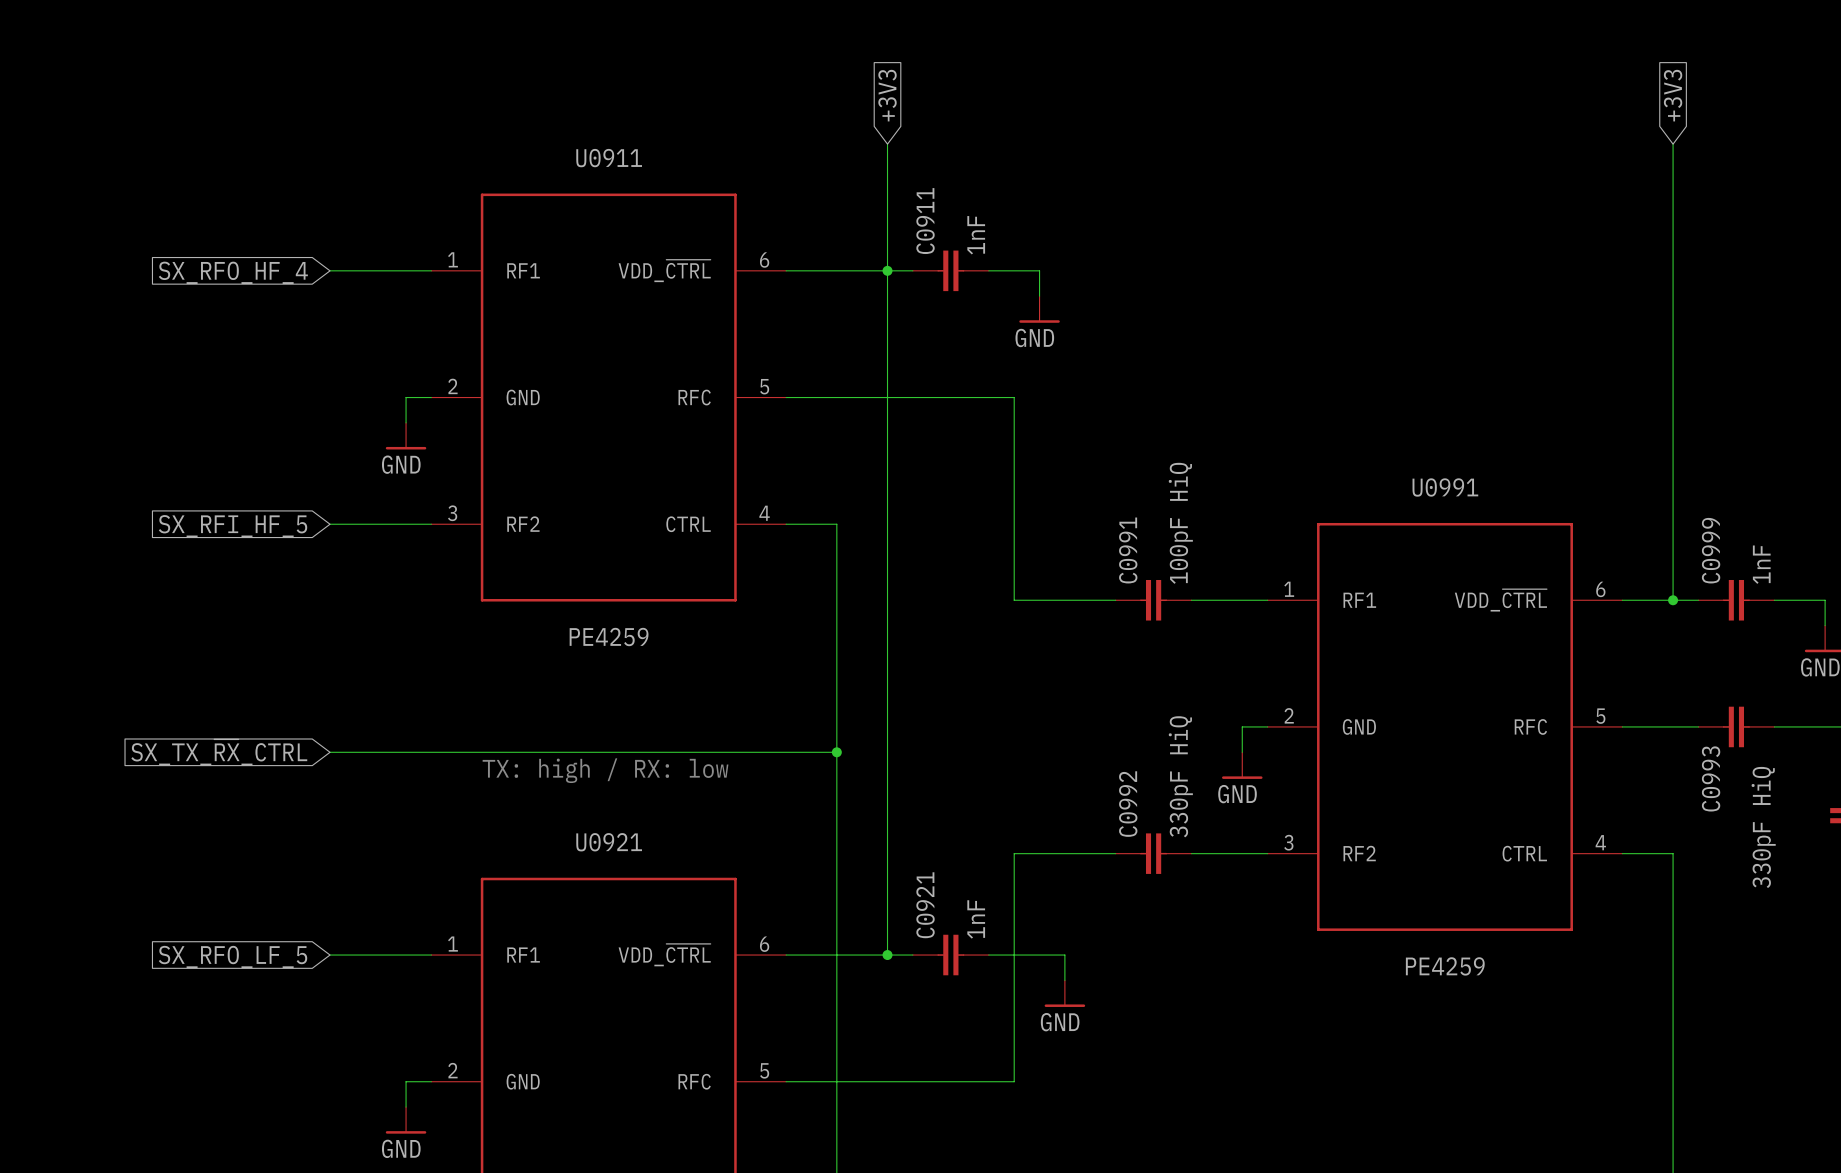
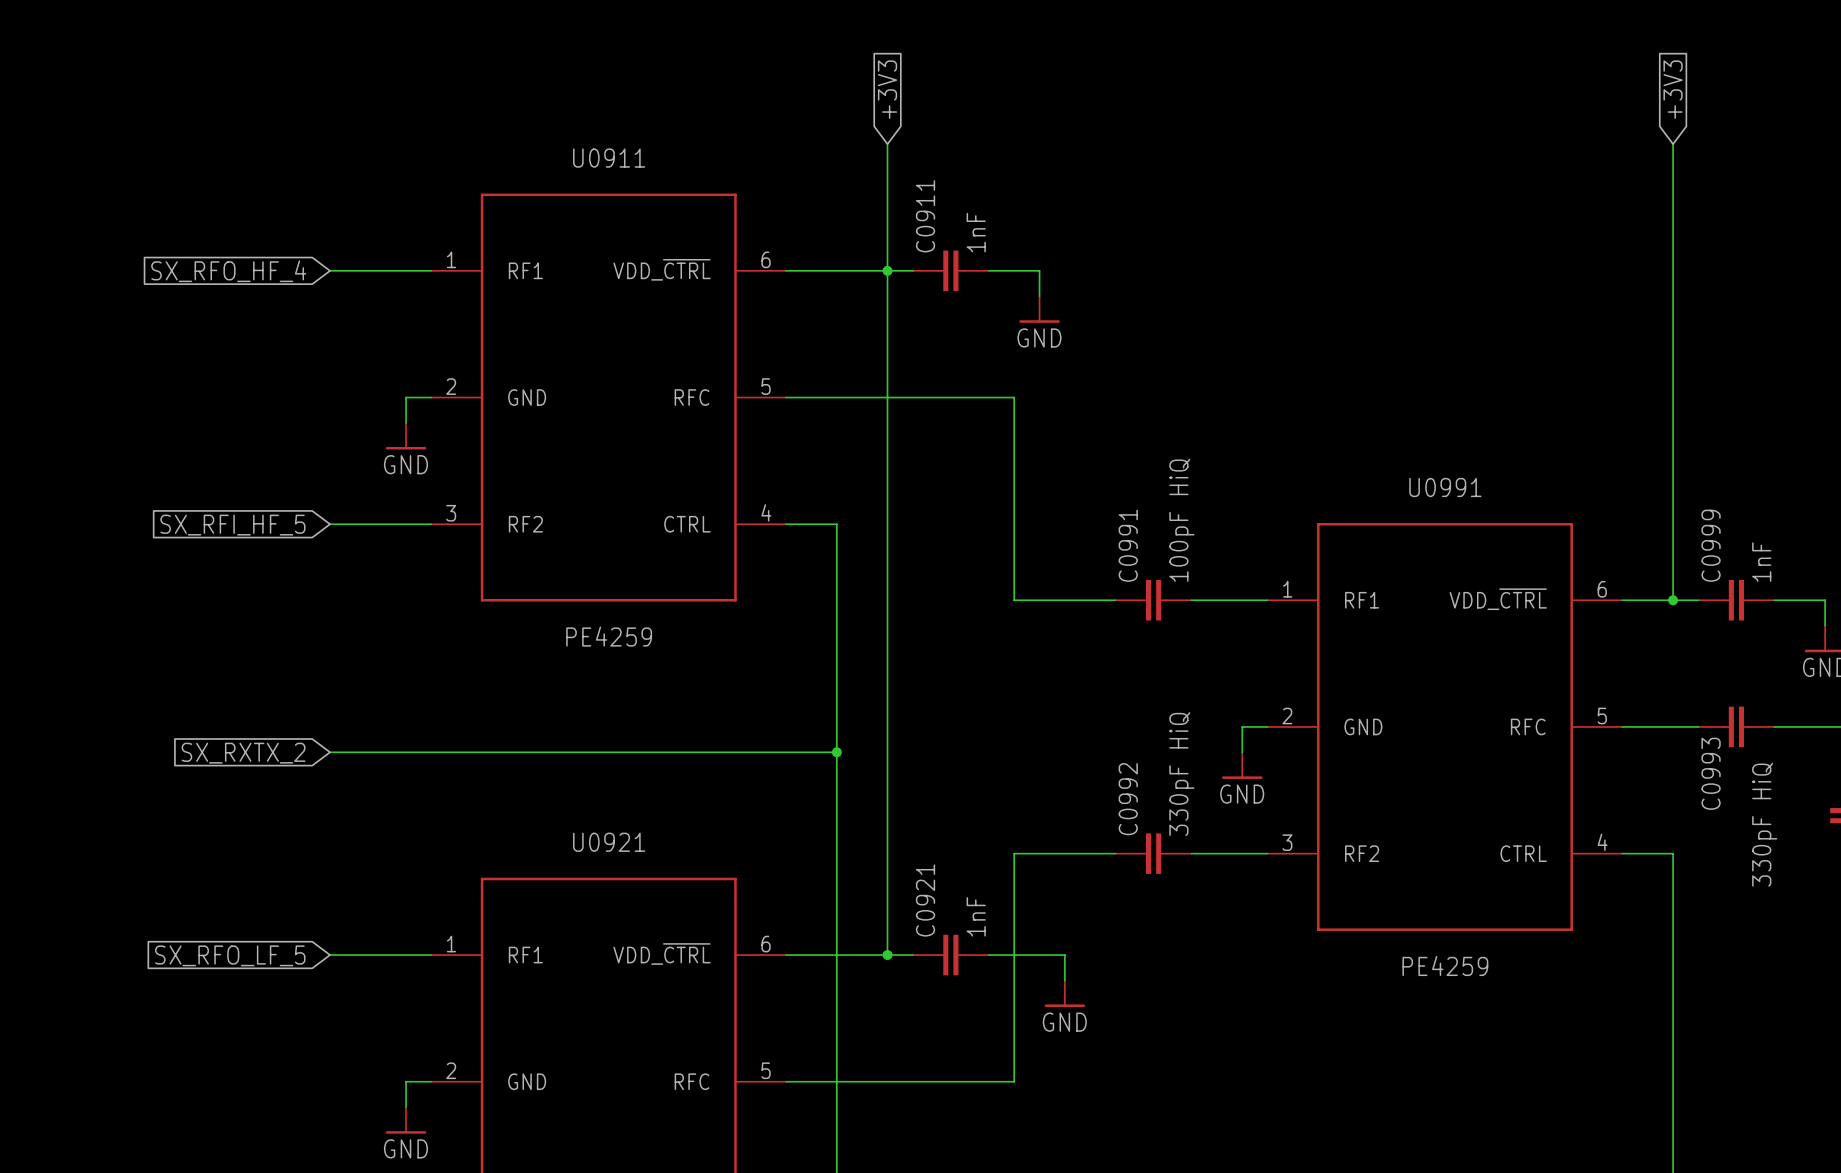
global label: SX_TX_~{RX}_CTRL (219, 752) -> SX_RXTX_2 (243, 753)
text: TX: high / RX: low (605, 770) -> none

